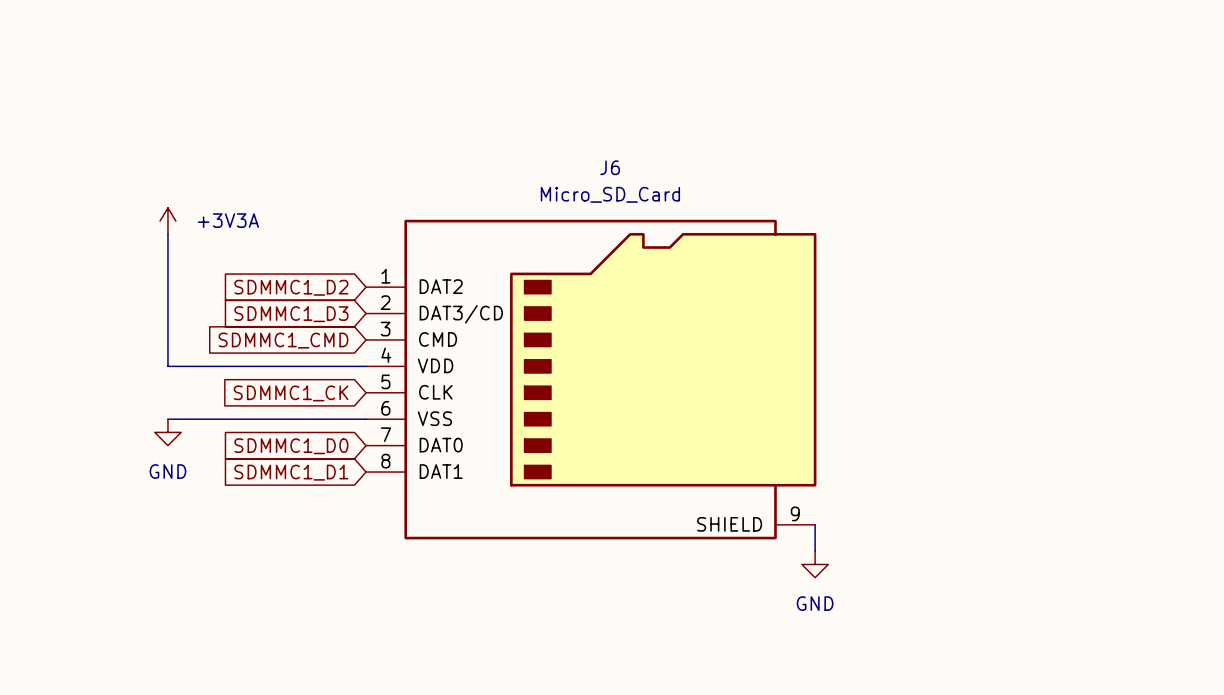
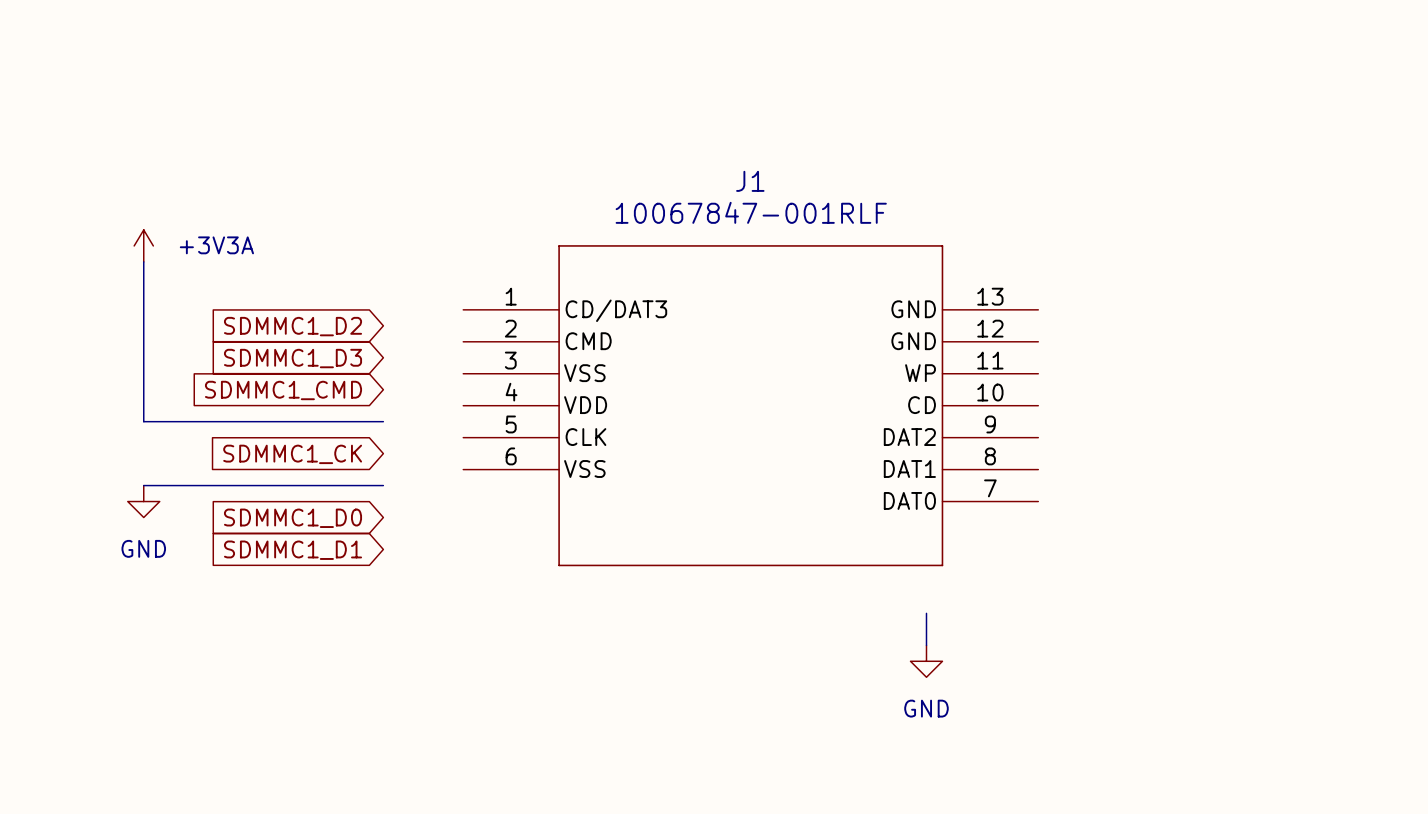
J1: none -> 10067847-001RLF (750, 405)
J6: Micro_SD_Card (591, 379) -> none

